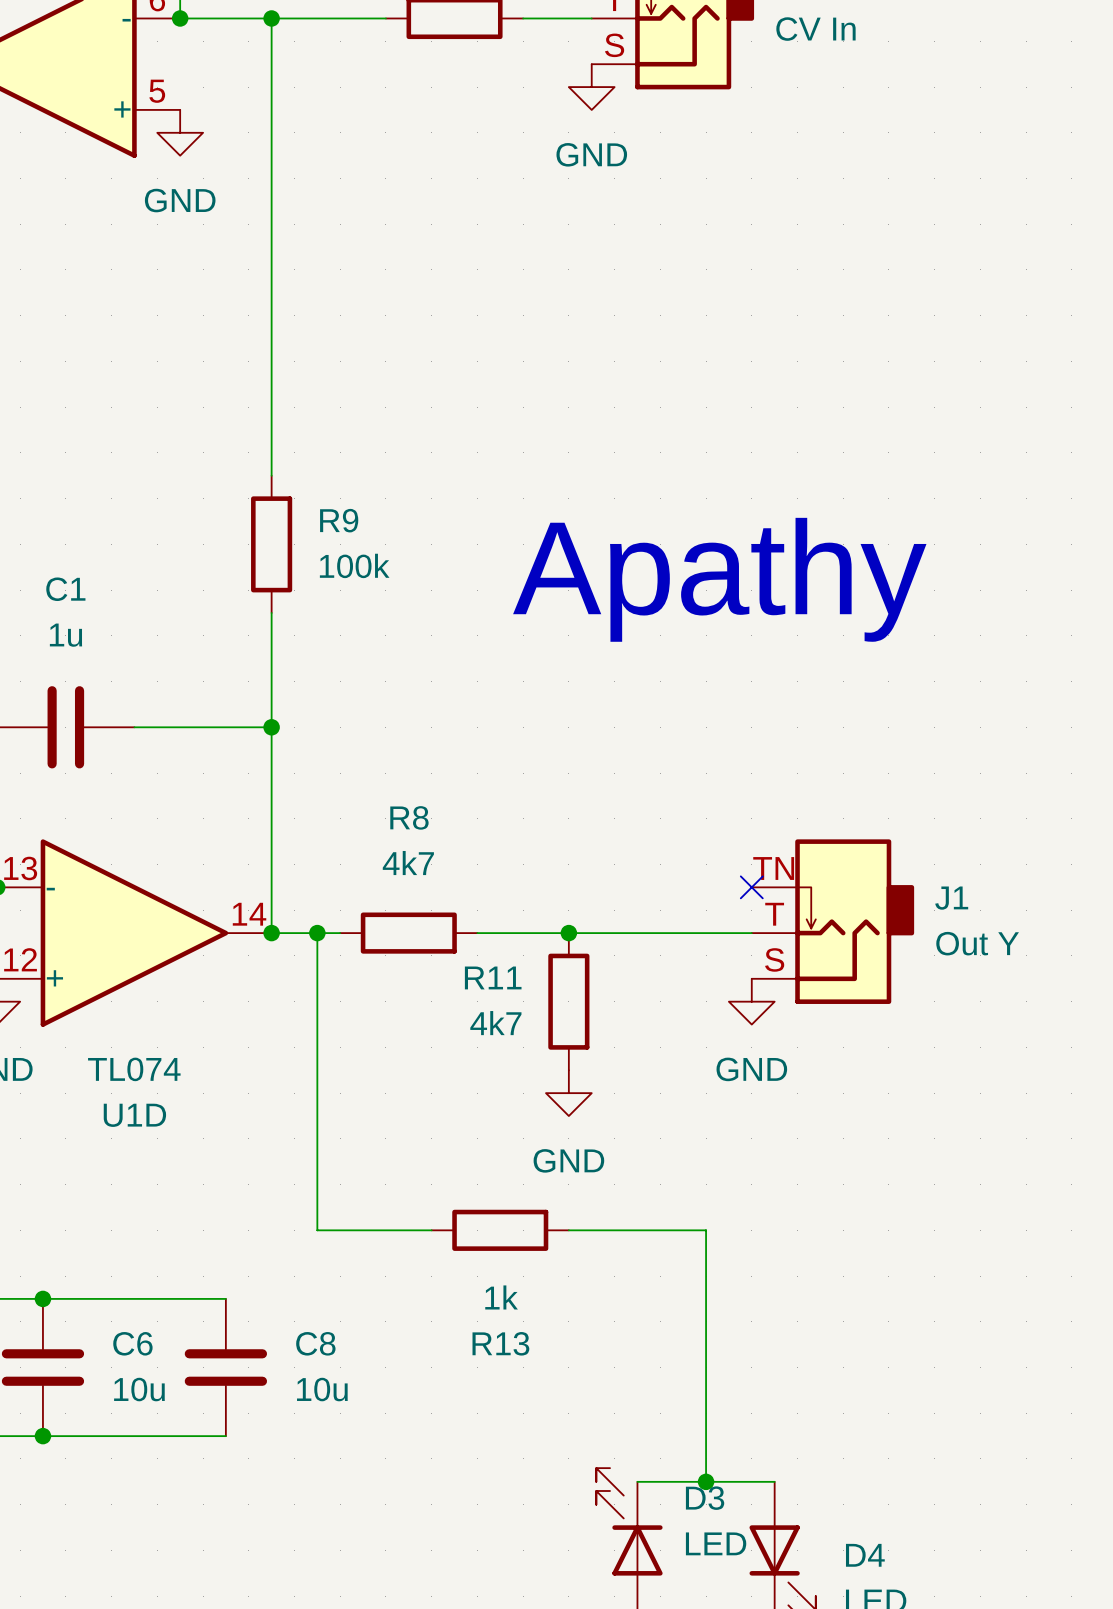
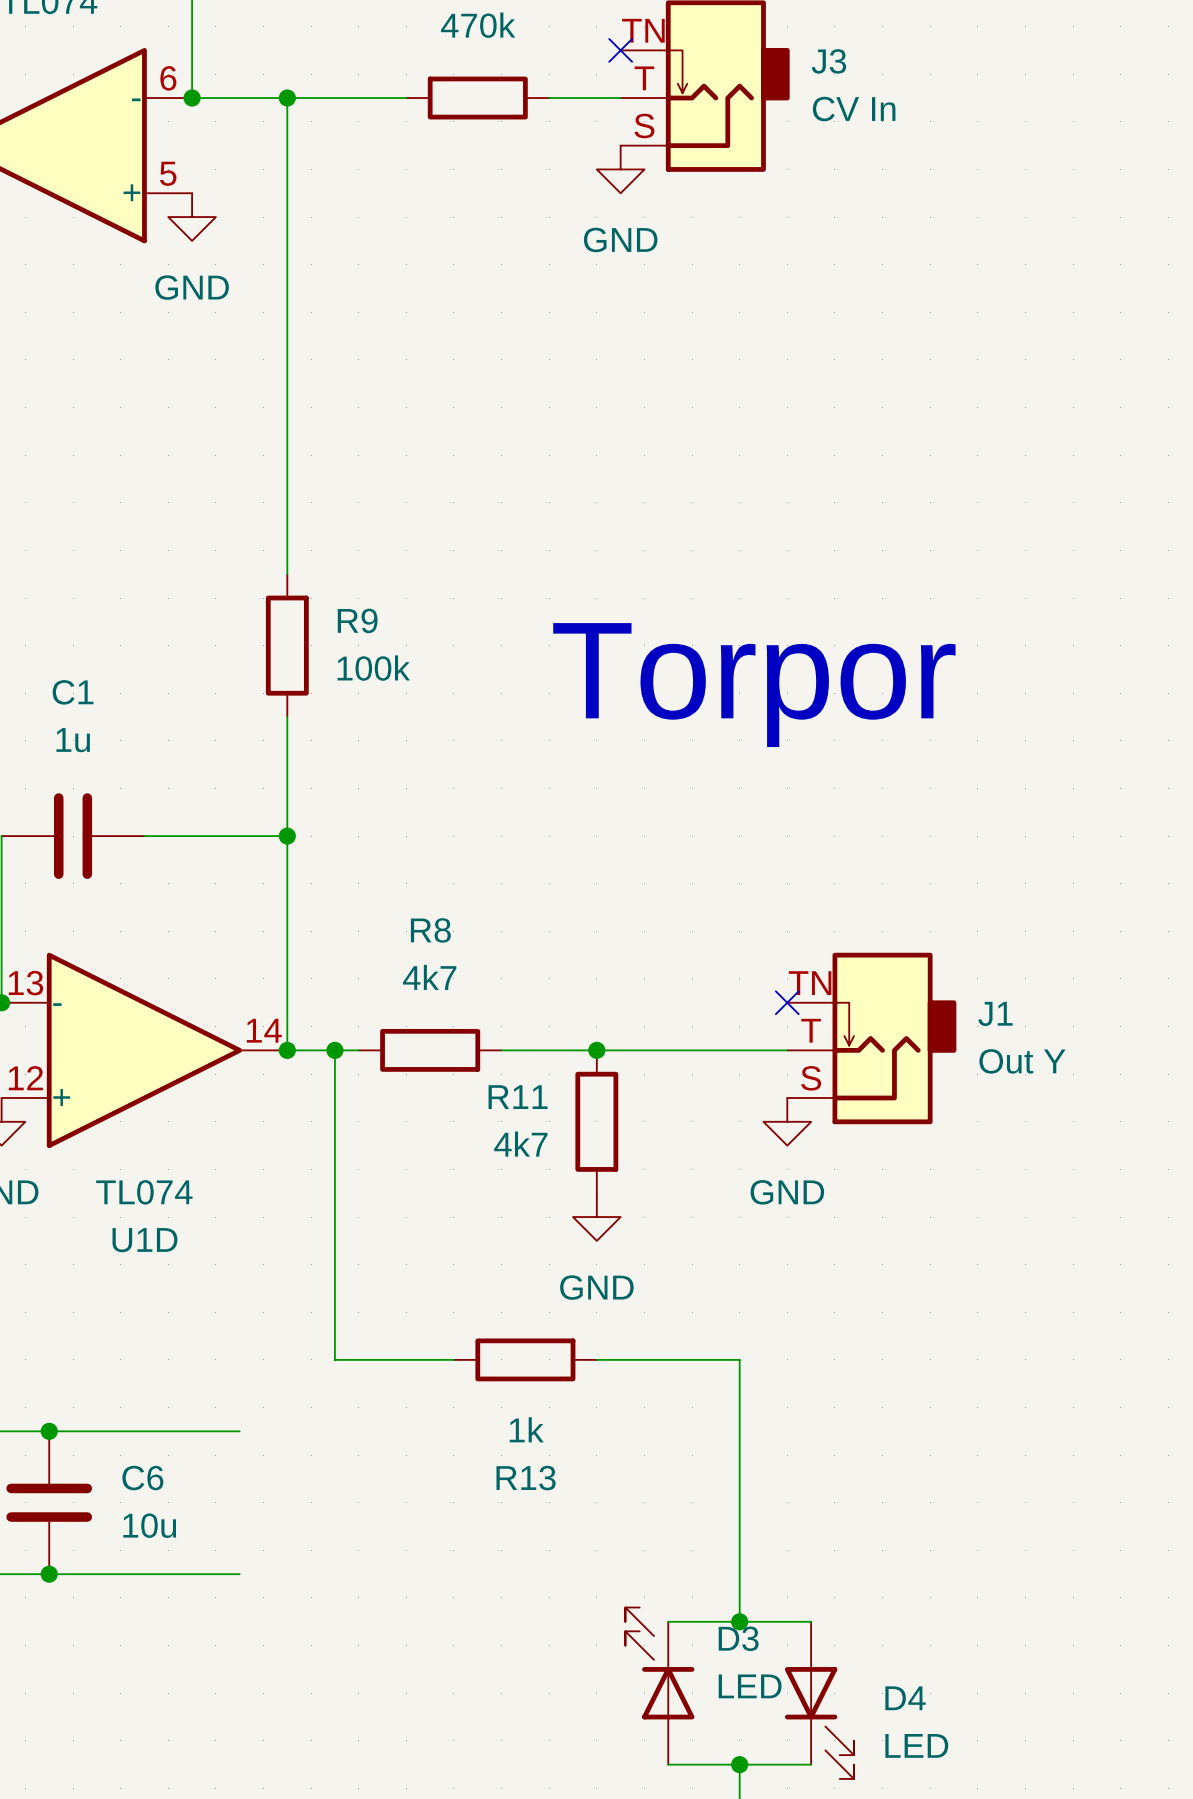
text: Apathy (719, 579) -> Torpor (754, 685)
C8: 10u (225, 1367) -> none

